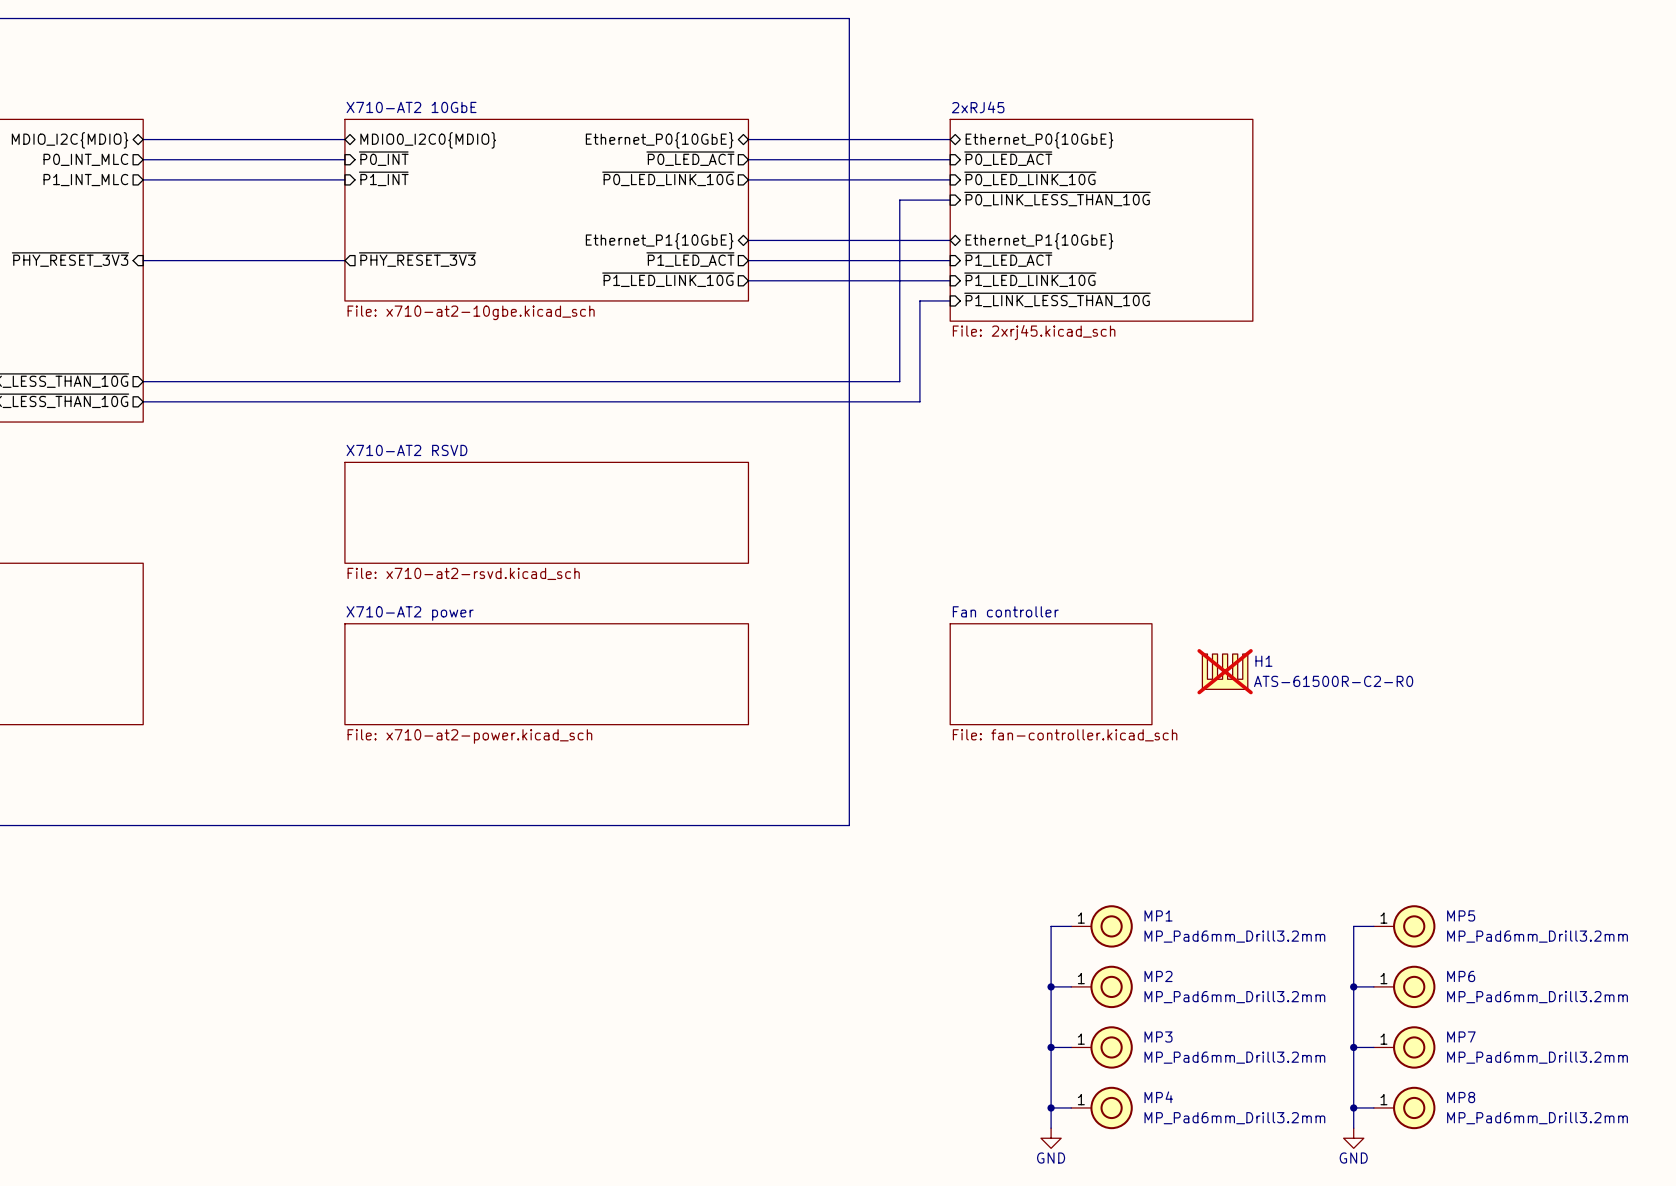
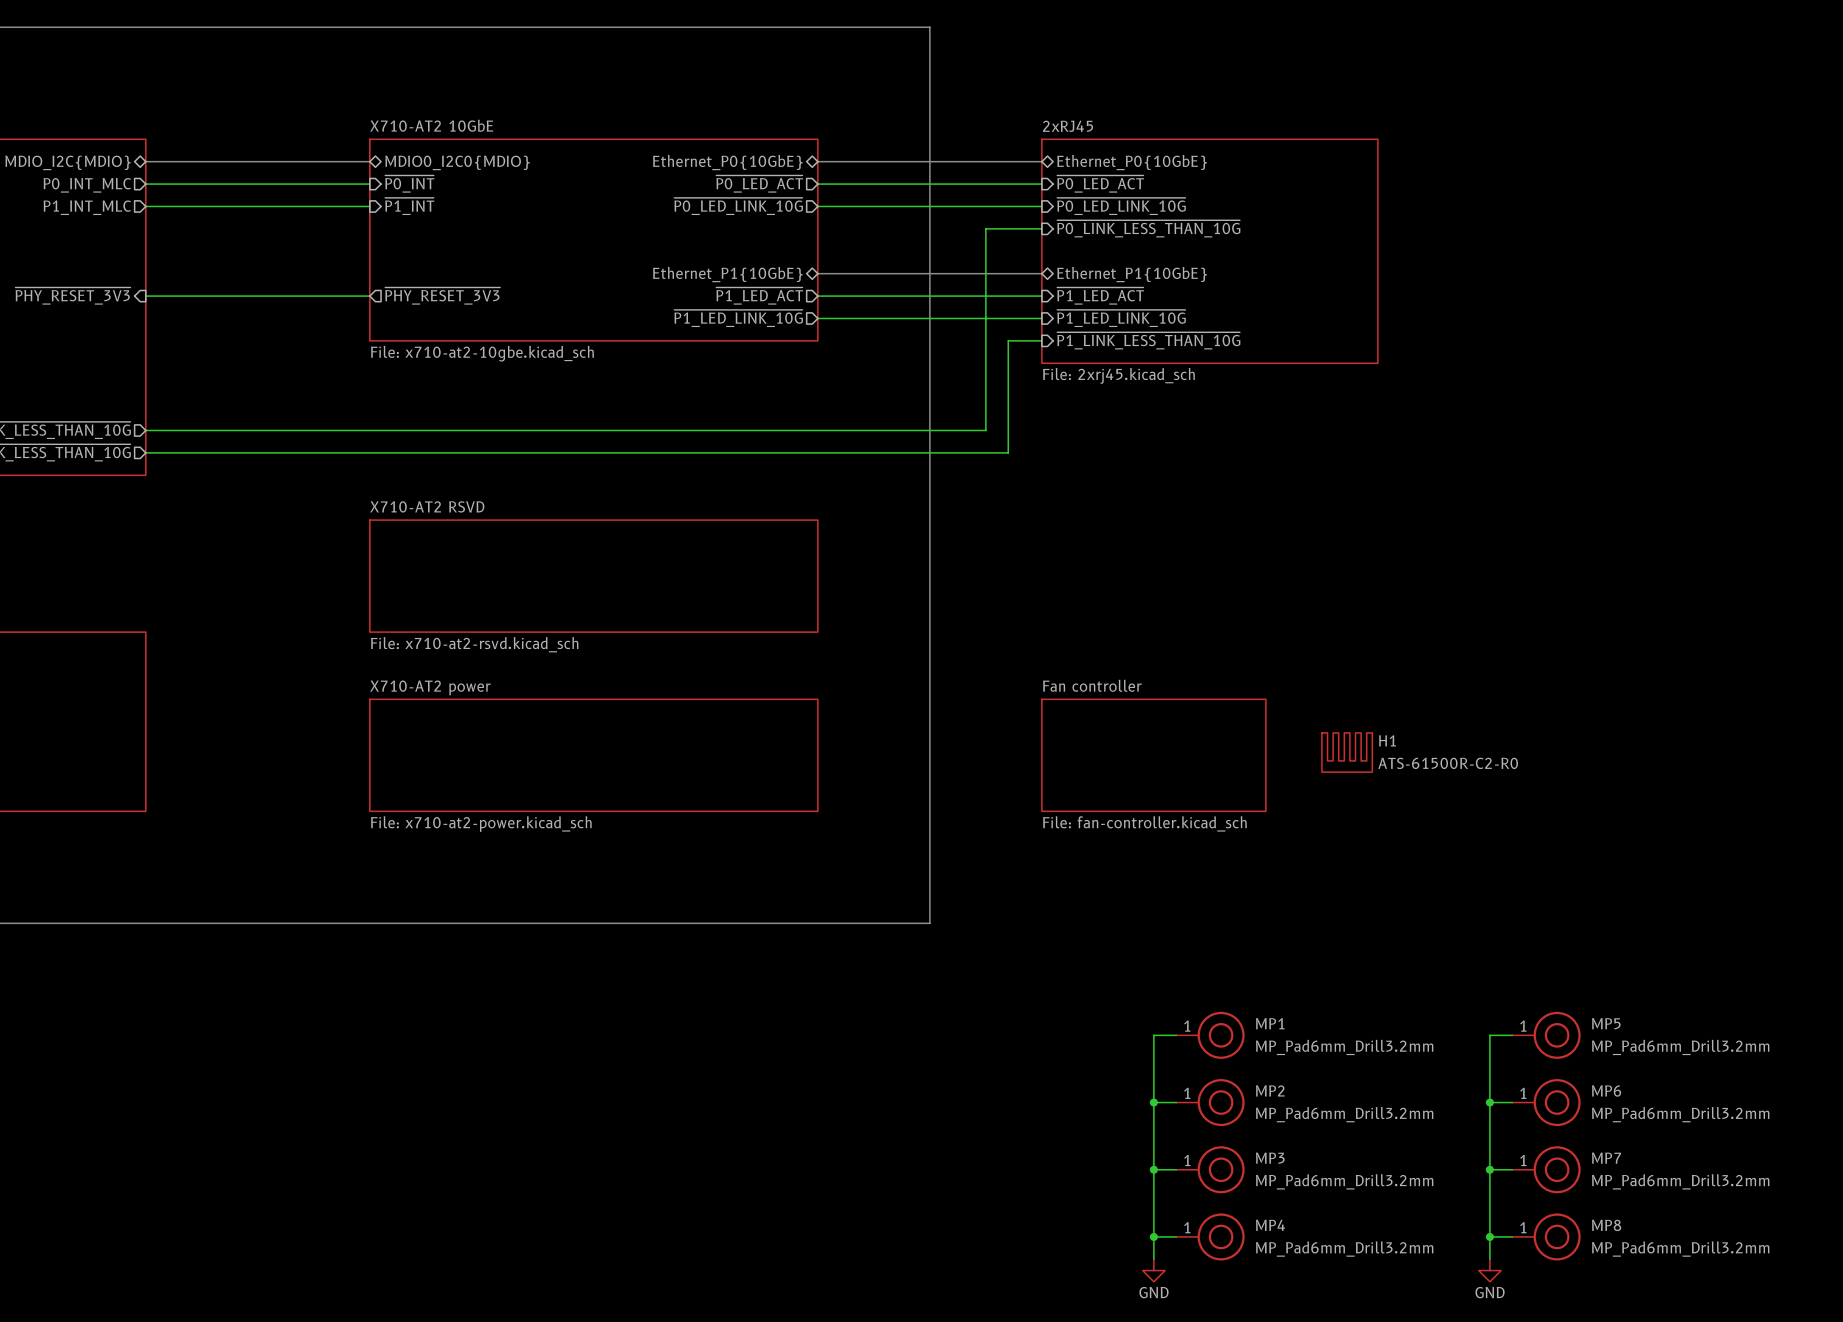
H1 do-not-place cross: (1225, 671) -> none

